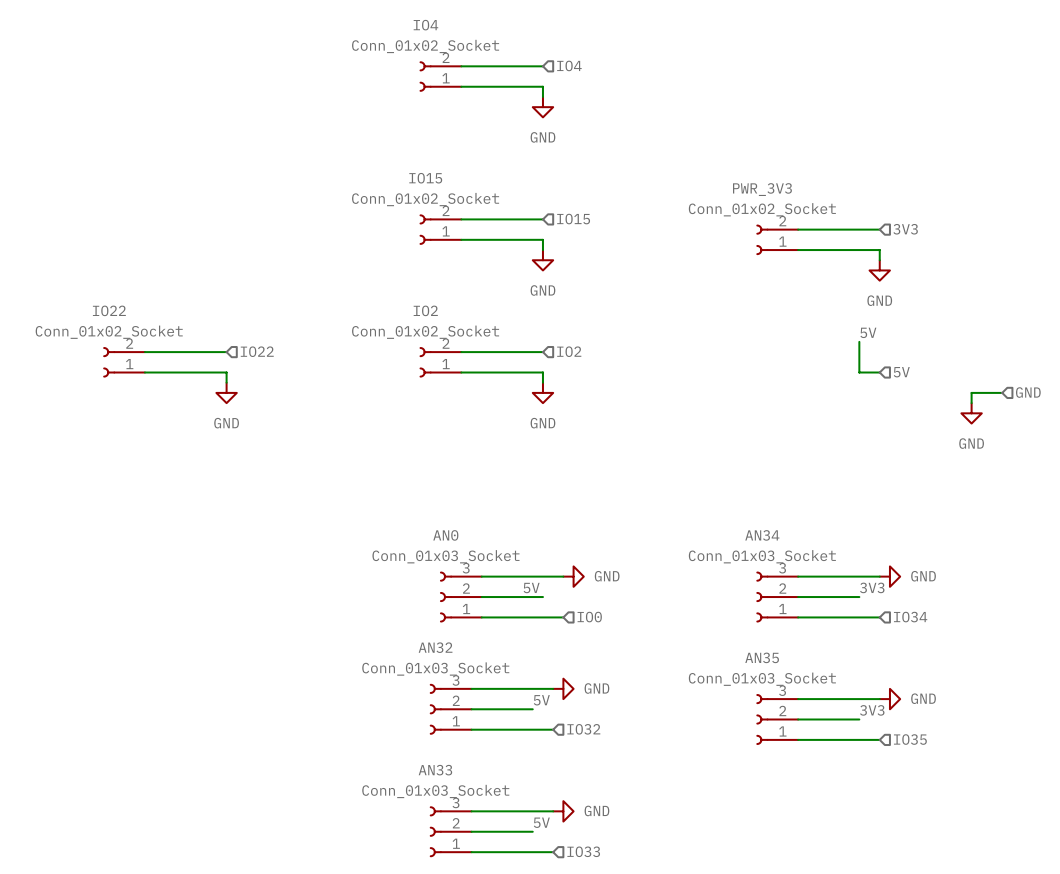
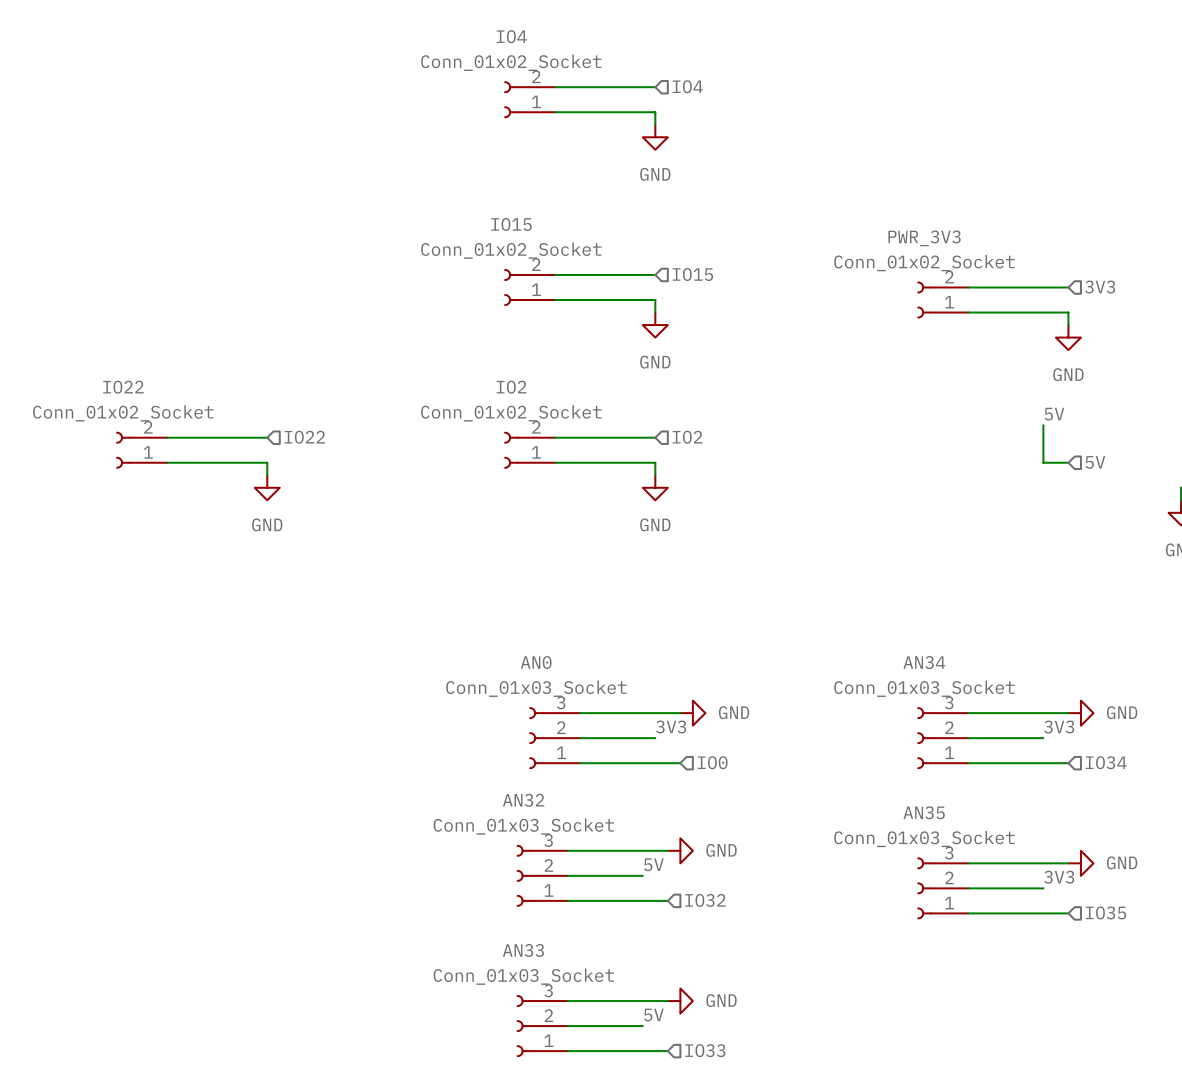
label: none -> 3V3 (671, 726)
label: 5V (531, 588) -> none

